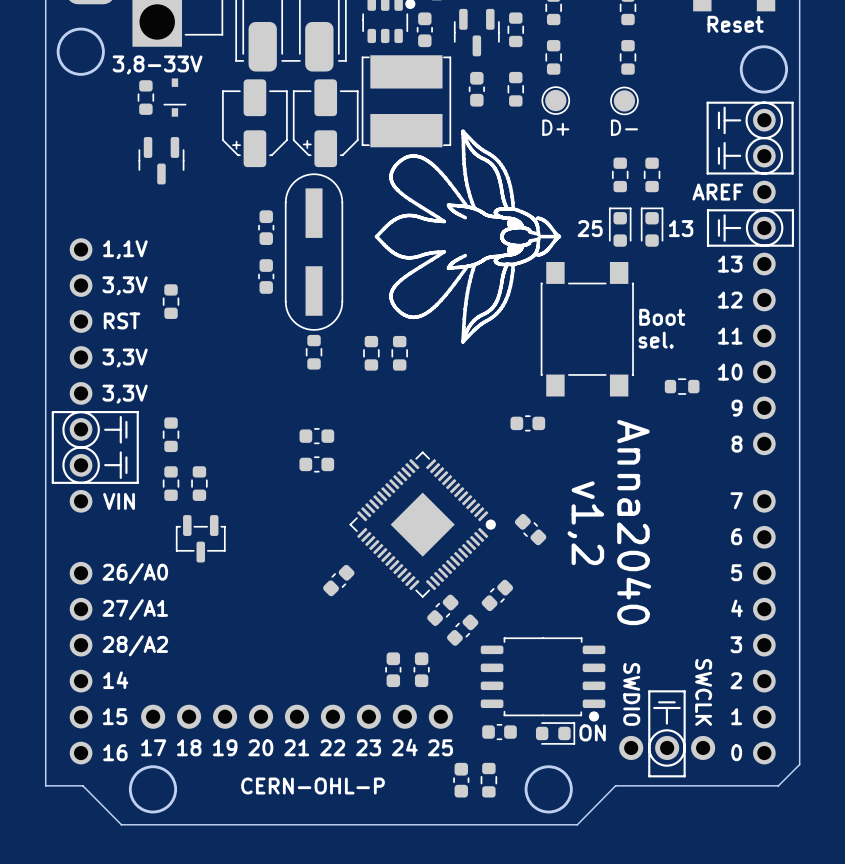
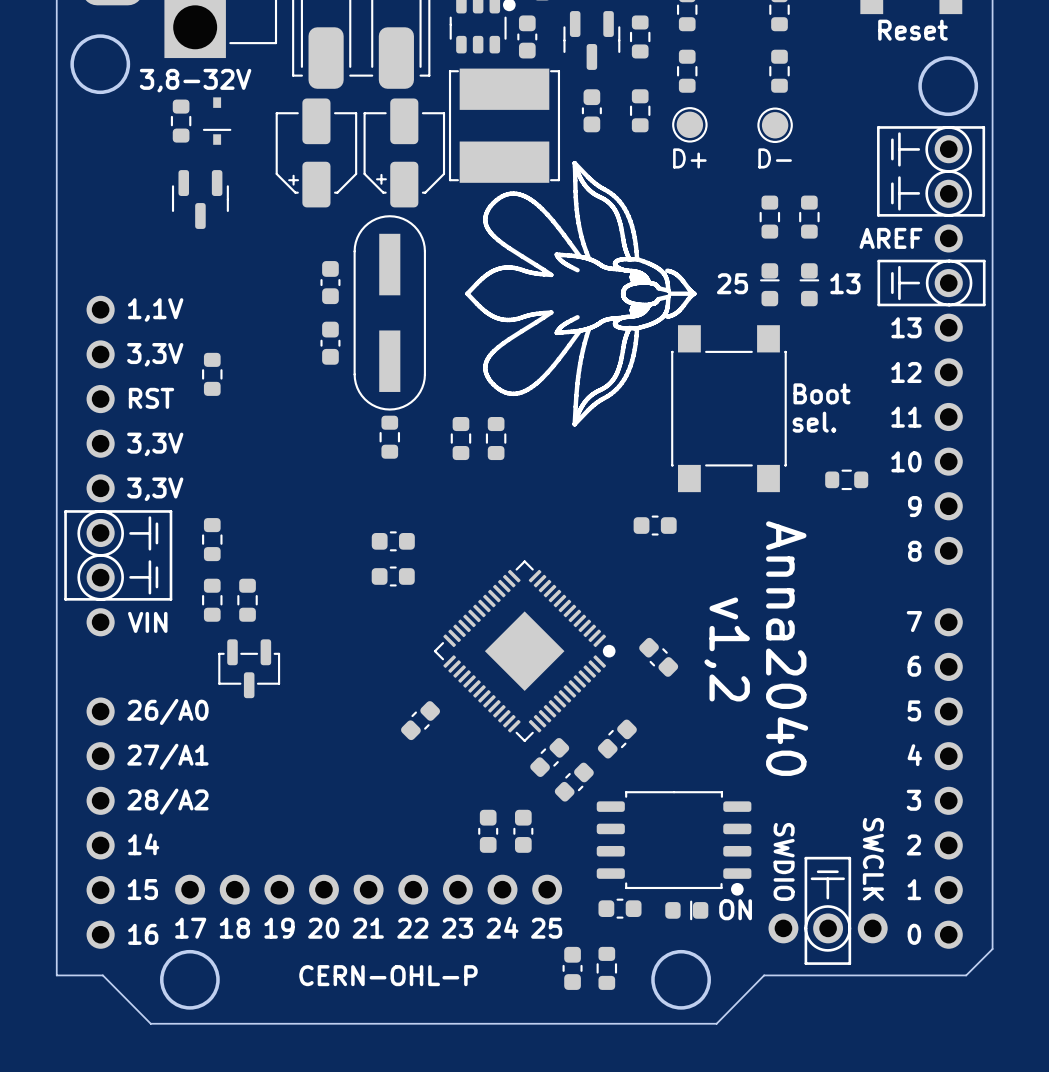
text: 3,8-33V (157, 64) -> 3,8-32V (195, 80)
part footprint: [608, 207, 632, 247] -> [759, 263, 780, 307]
part footprint: [640, 207, 664, 247] -> [799, 263, 820, 307]
part footprint: [535, 722, 576, 745] -> [665, 900, 709, 921]

